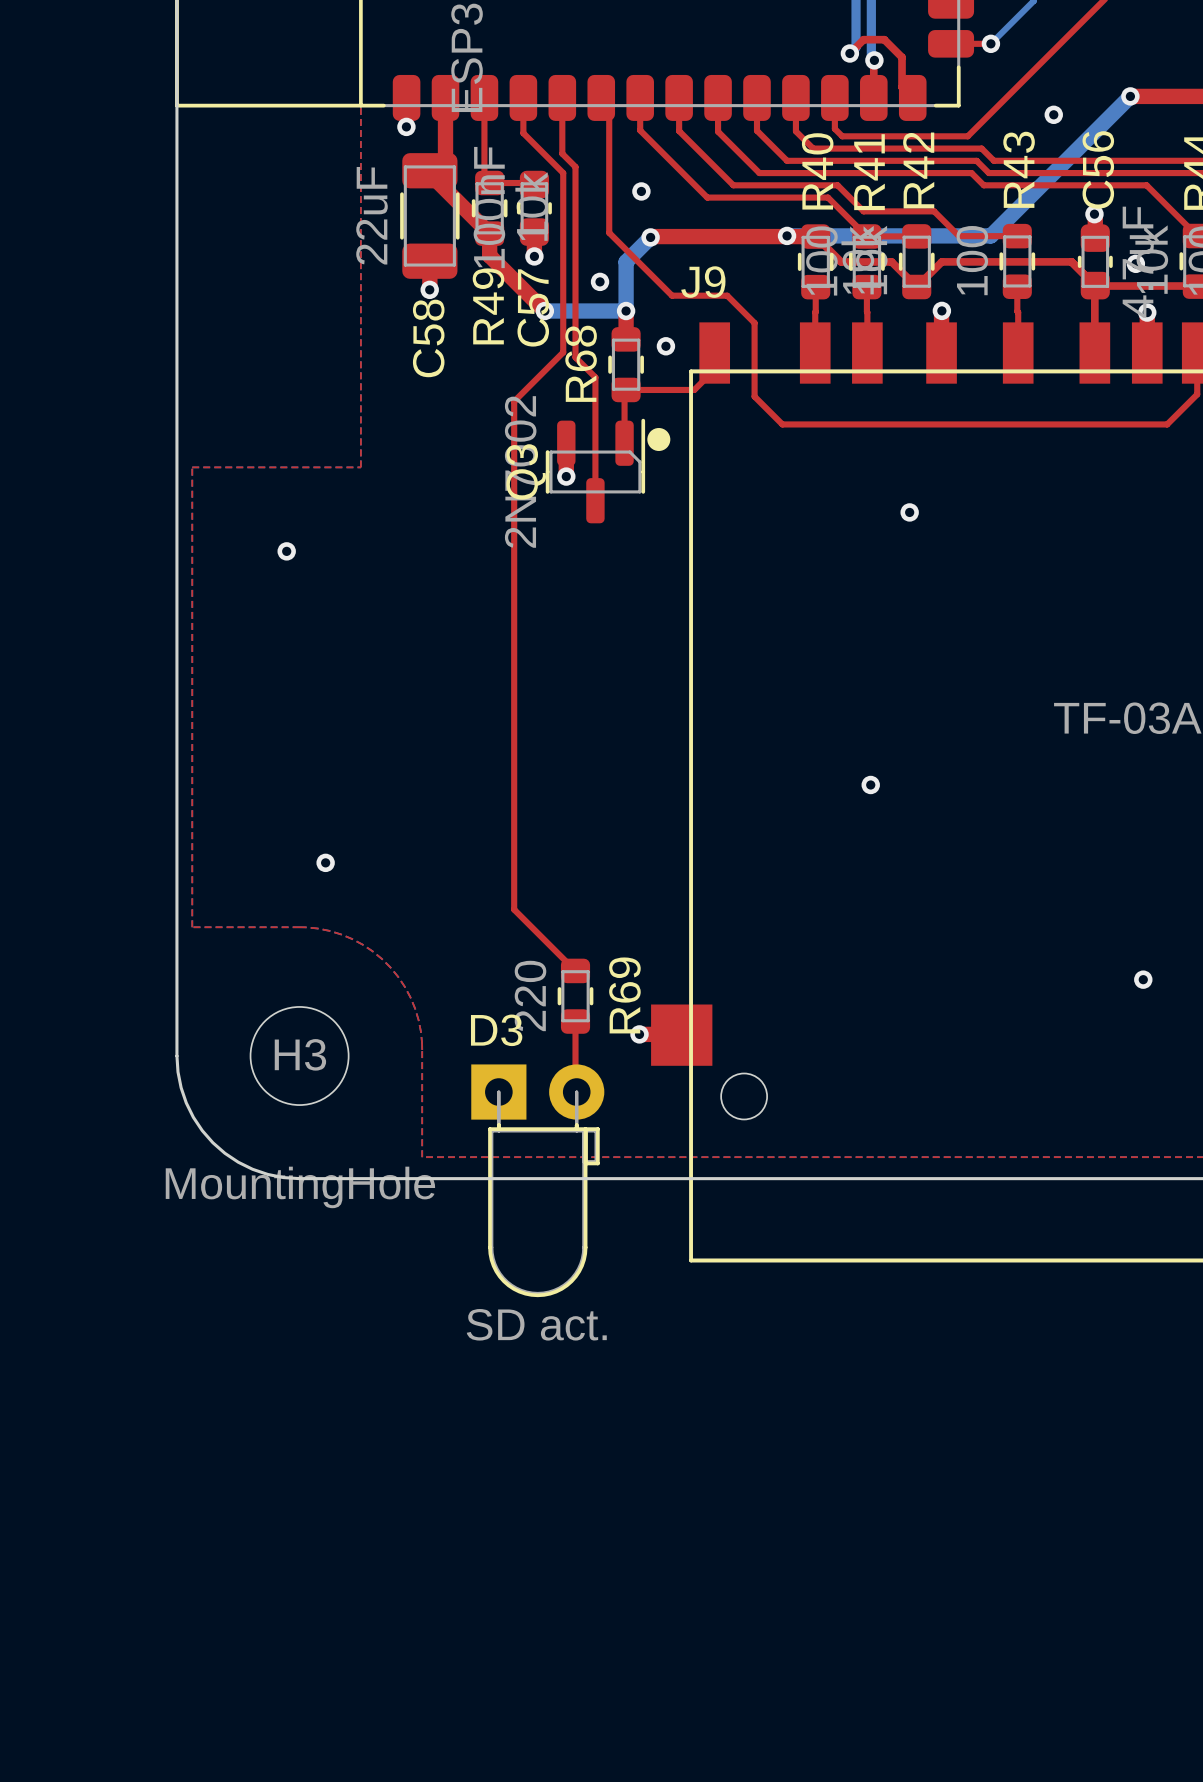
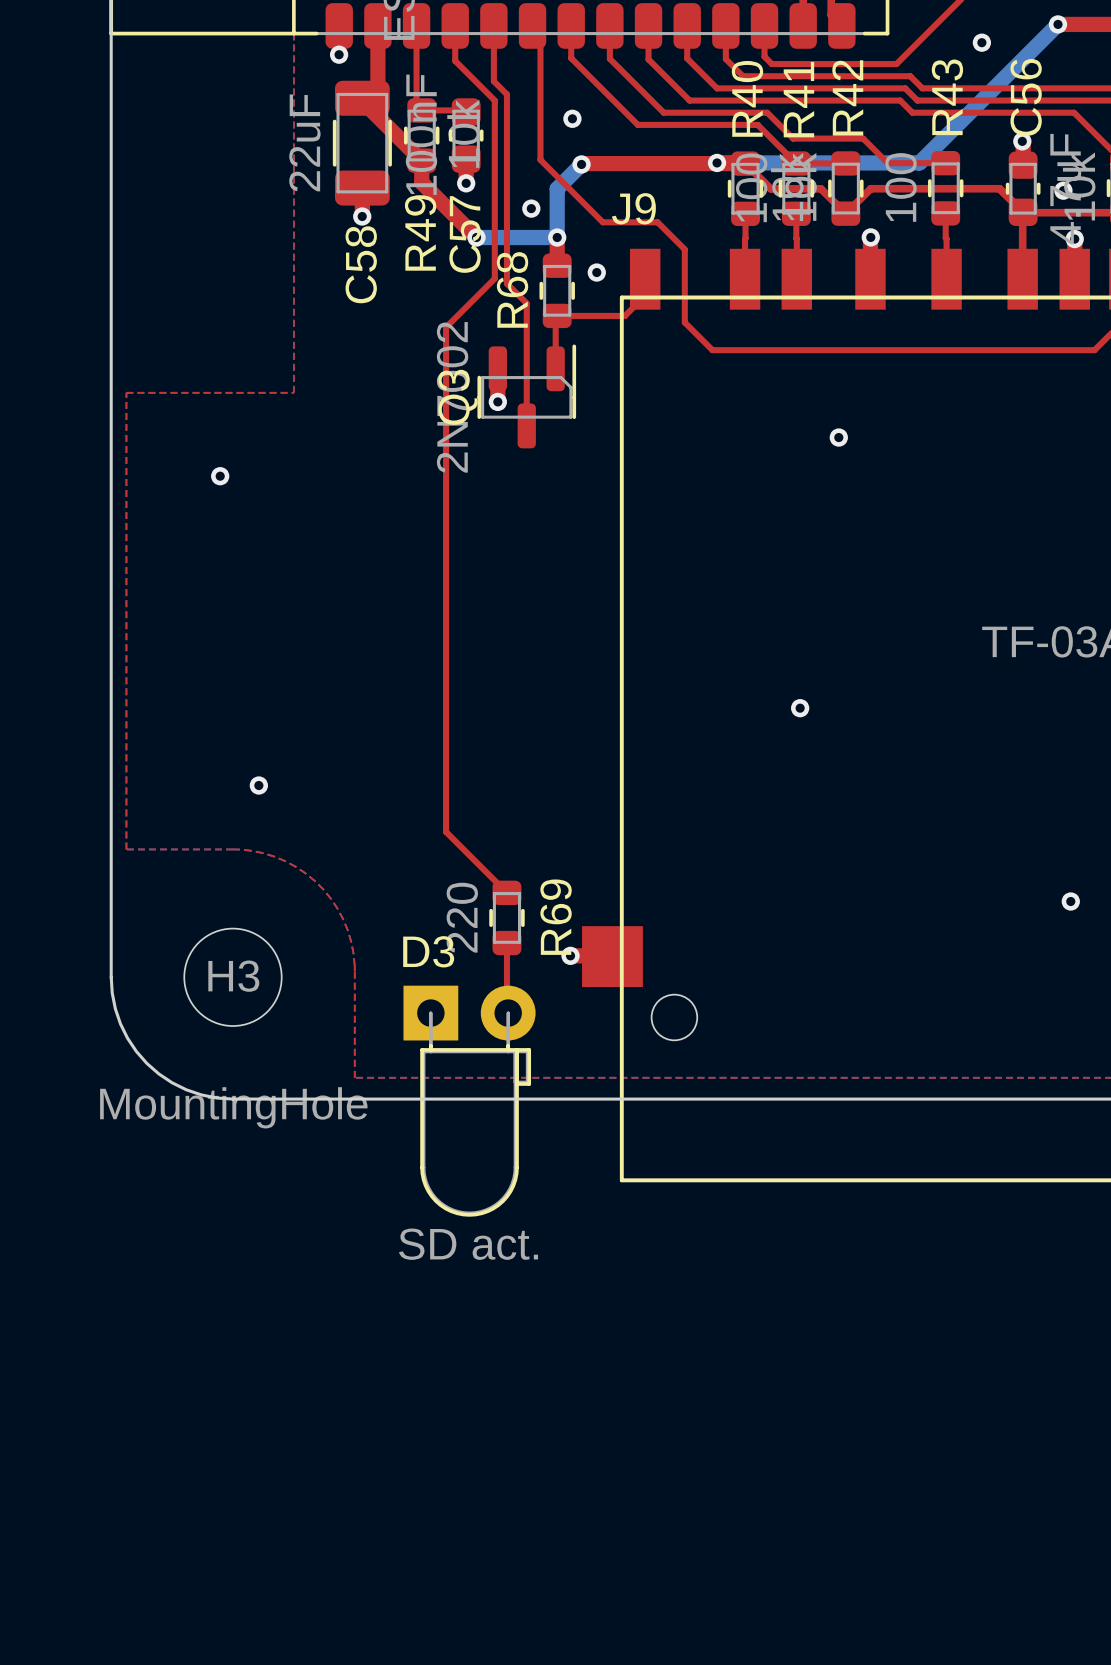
drawing: [647, 428, 671, 451] -> none

